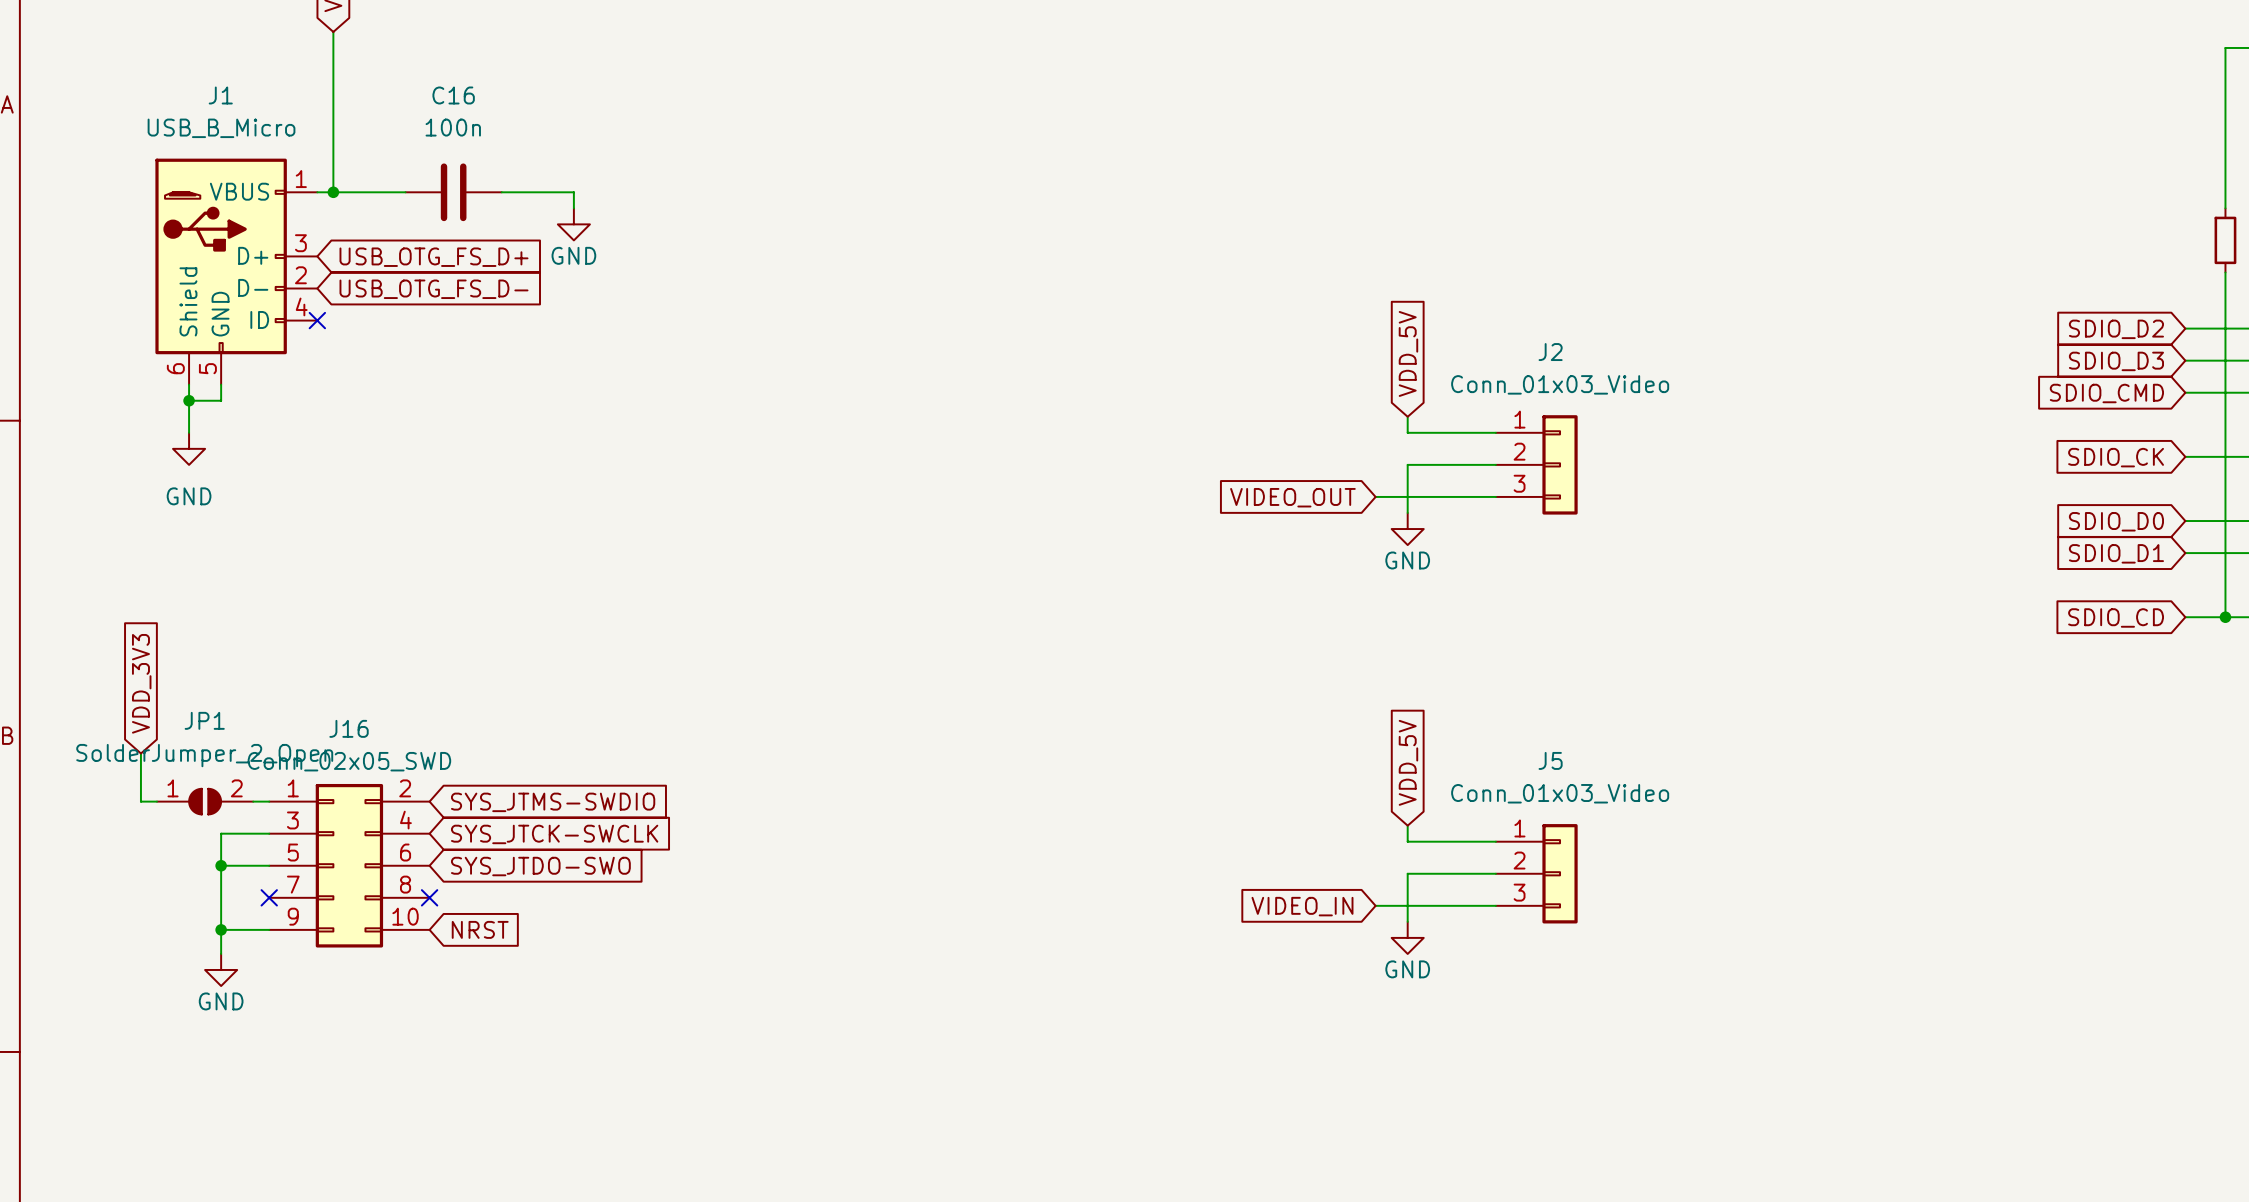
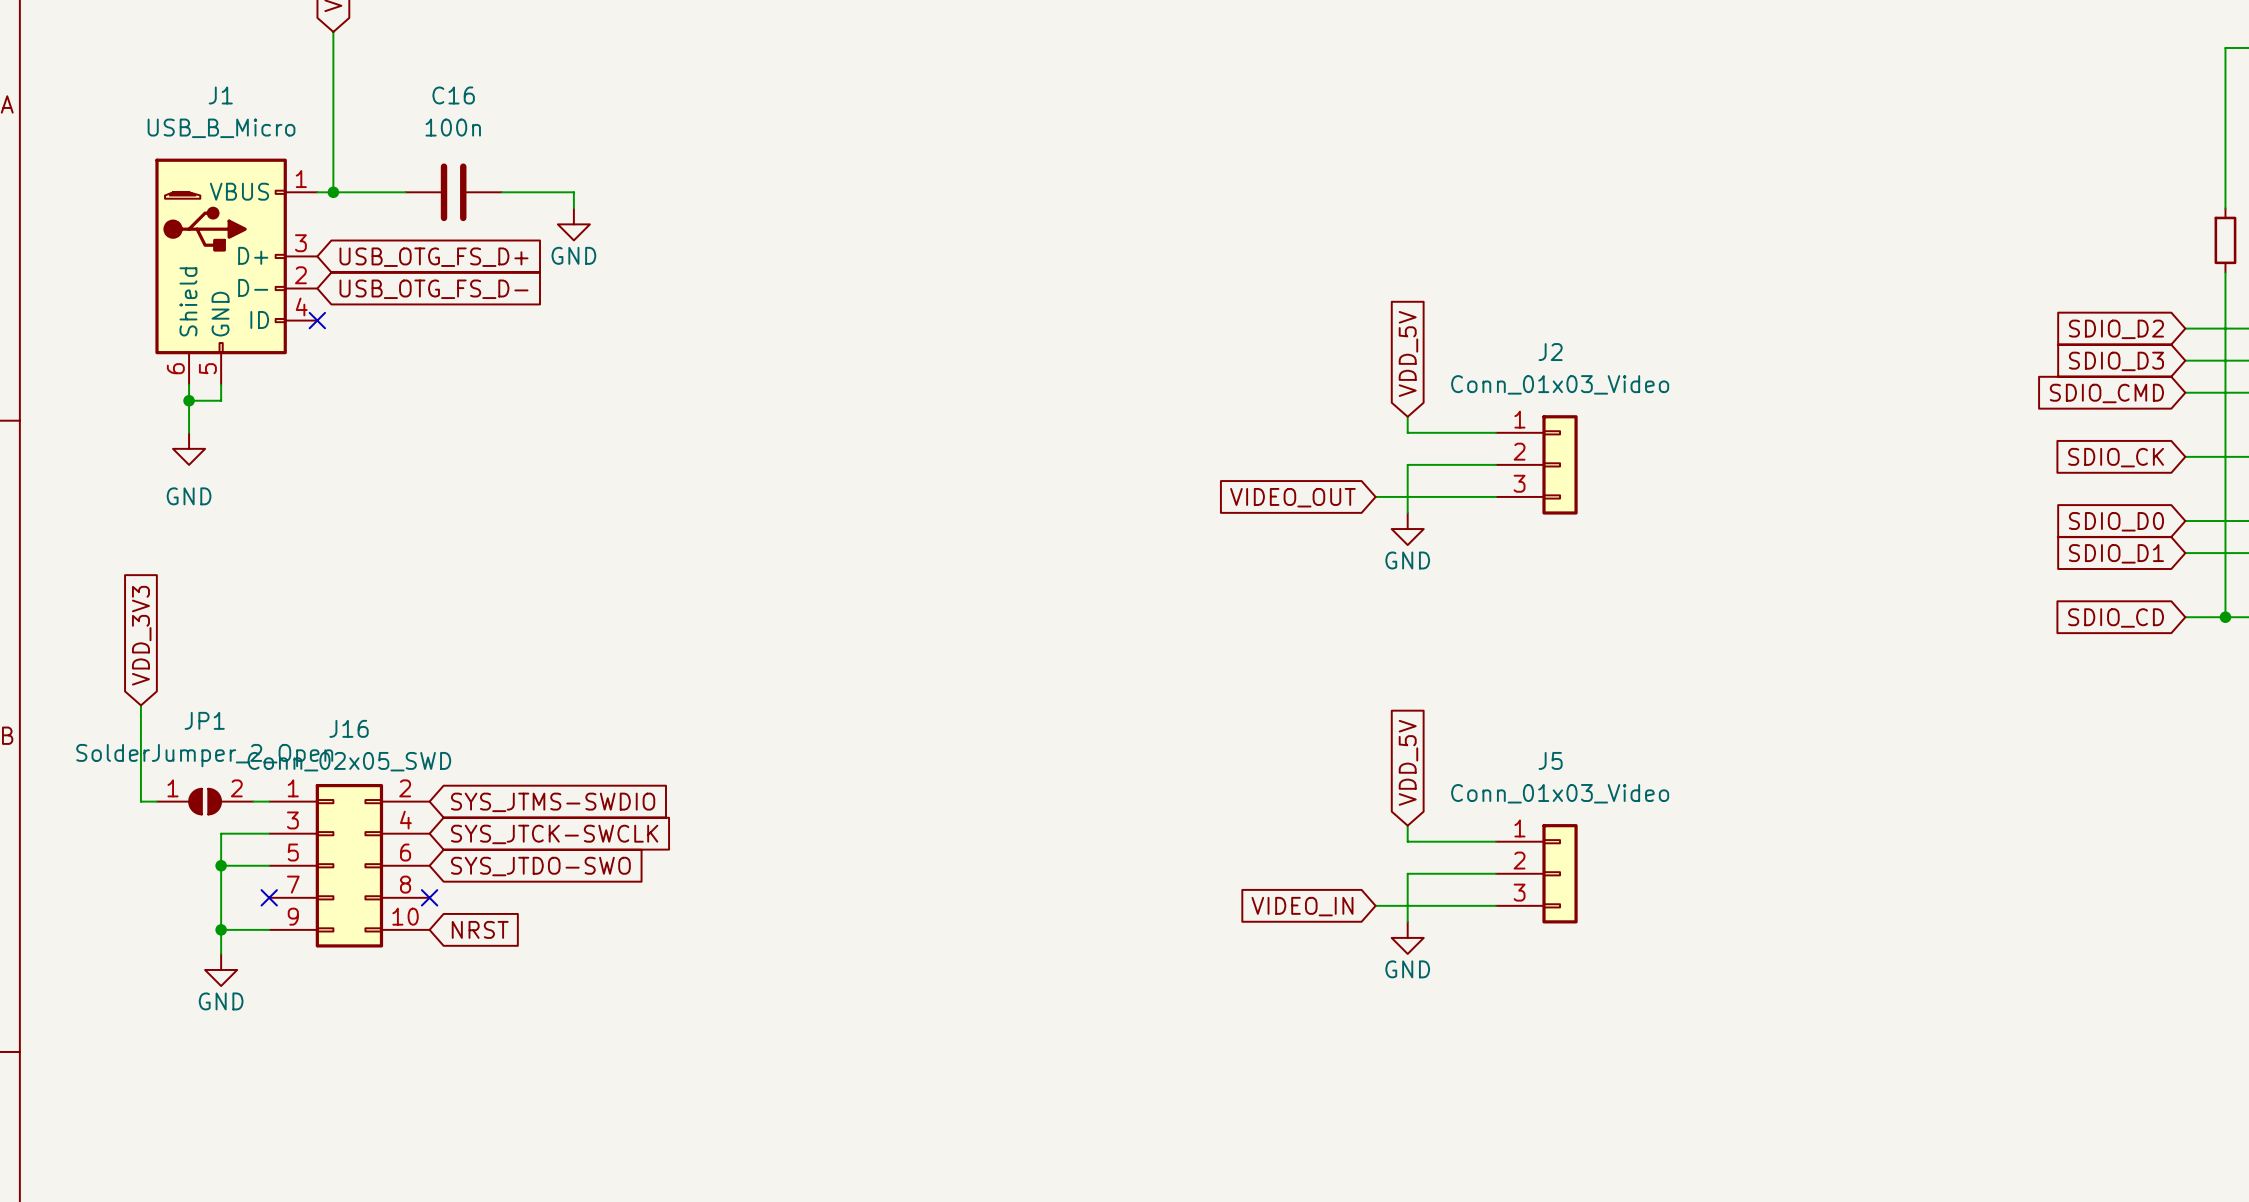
global label position: VDD_3V3 (141, 683) -> VDD_3V3 (141, 635)
wire: none -> (140, 705) (140, 753)

